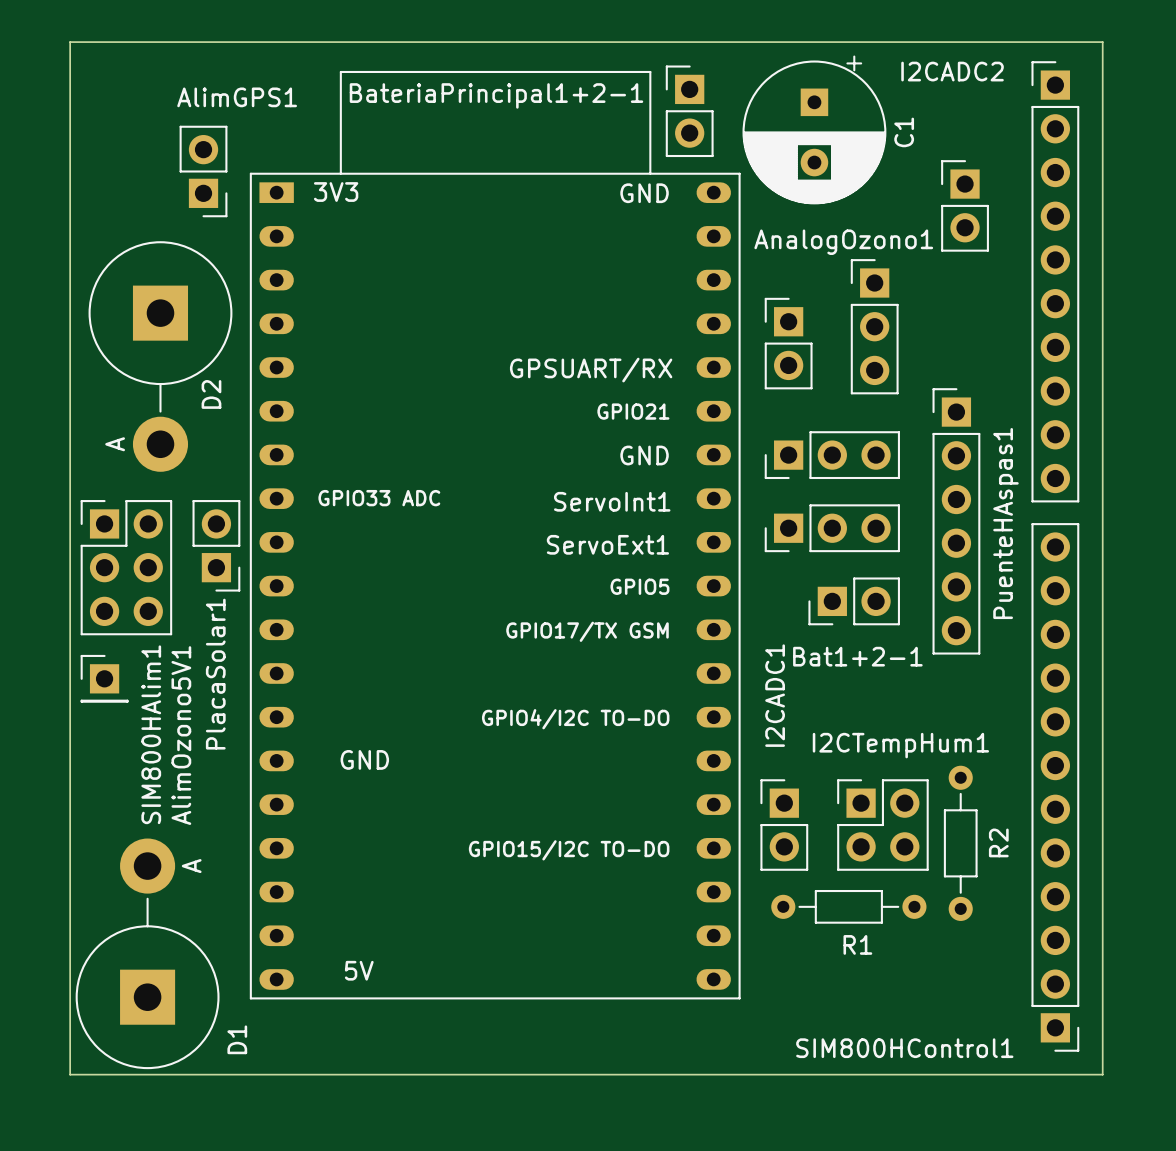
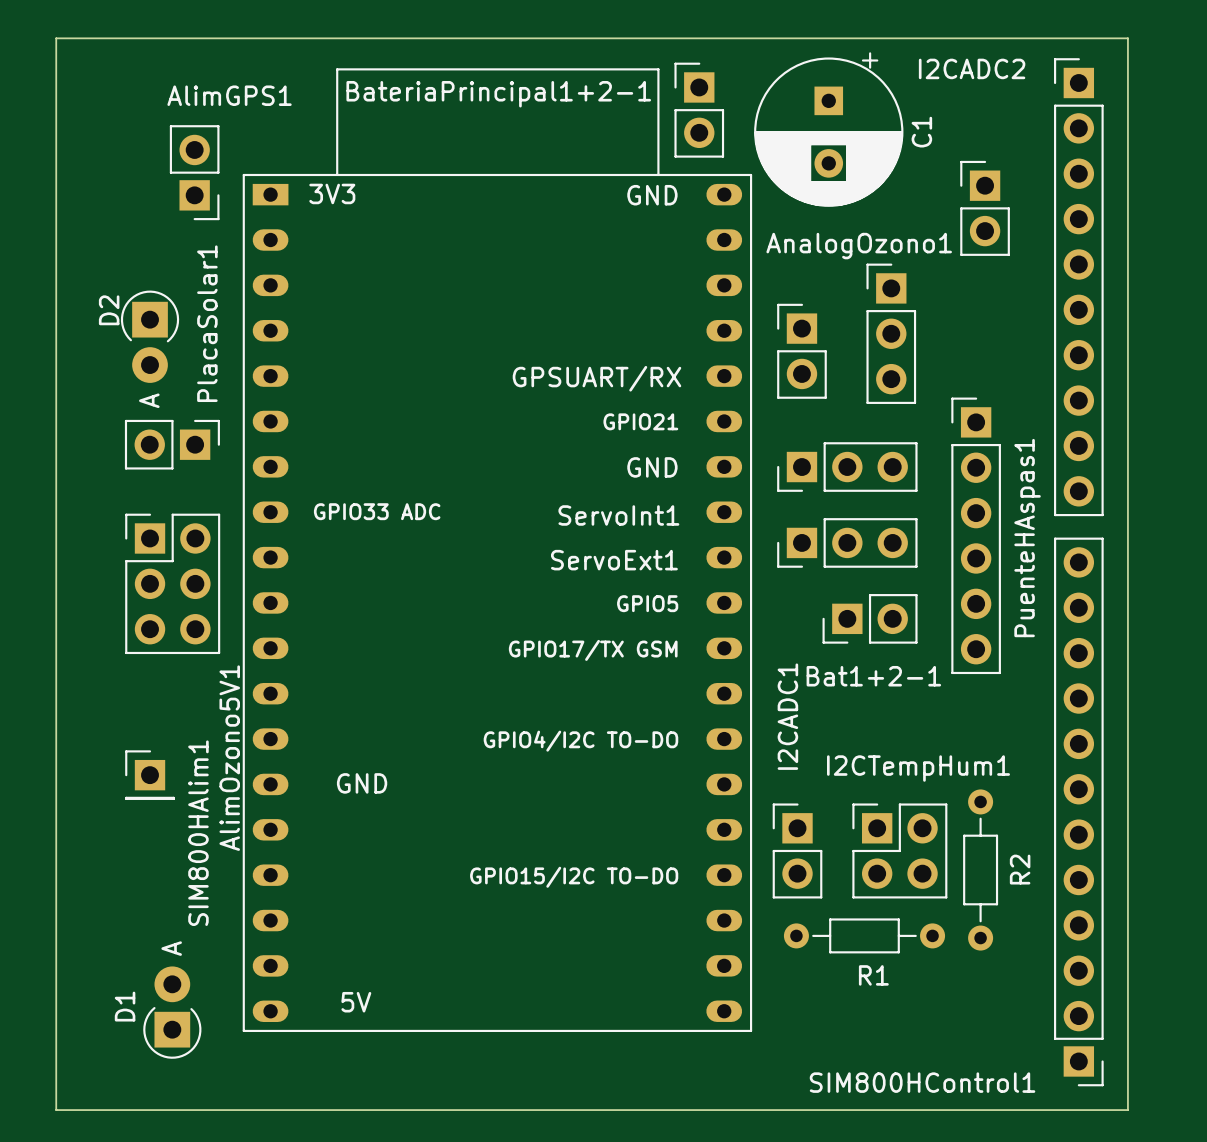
D2 footprint: [88, 241, 233, 472] -> [120, 290, 180, 383]
D2 name position: D2 (211, 394) -> D2 (109, 310)
PlacaSolar1 rotation: 0° (216, 545) -> 90° counterclockwise (172, 444)
PlacaSolar1 position: (216, 545) -> (172, 444)
AlimOzono5V1 position: (126, 567) -> (172, 583)
PlacaSolar1 name position: PlacaSolar1 (215, 674) -> PlacaSolar1 (207, 323)
SIM800HAlim1 position: (104, 678) -> (150, 775)
D1 footprint: [75, 838, 220, 1070] -> [143, 966, 202, 1059]
D1 name position: D1 (237, 1039) -> D1 (125, 1006)

